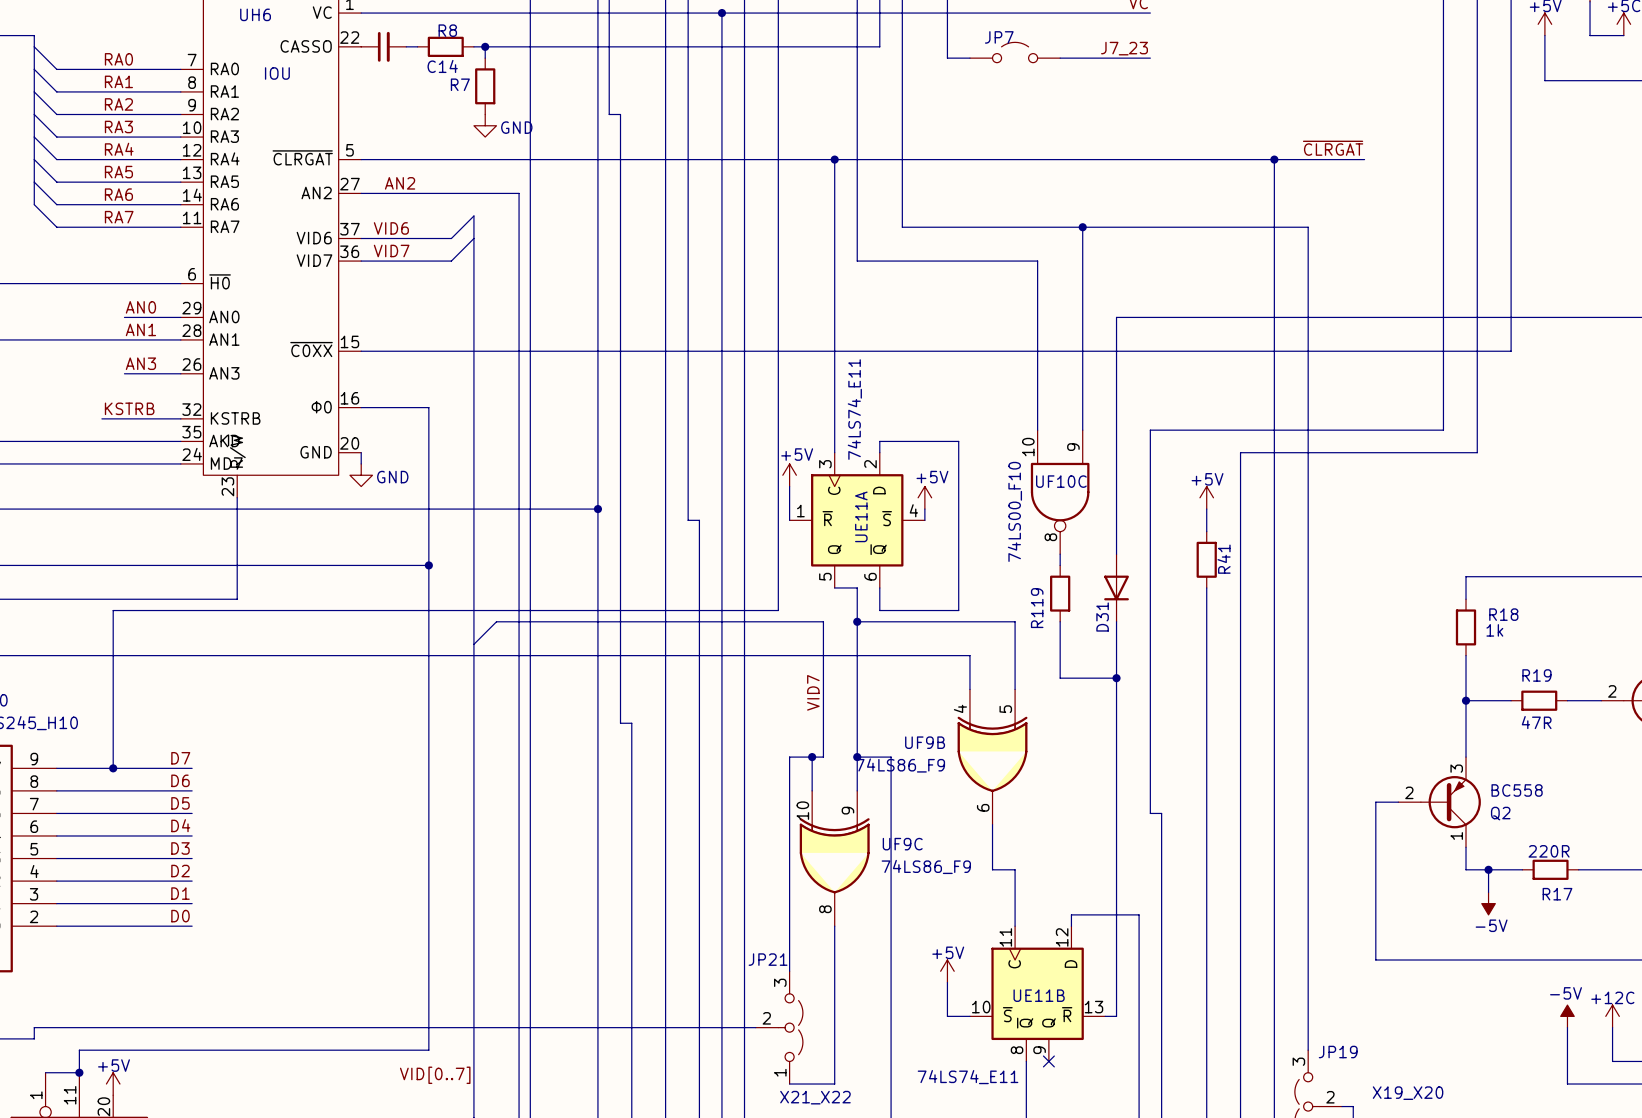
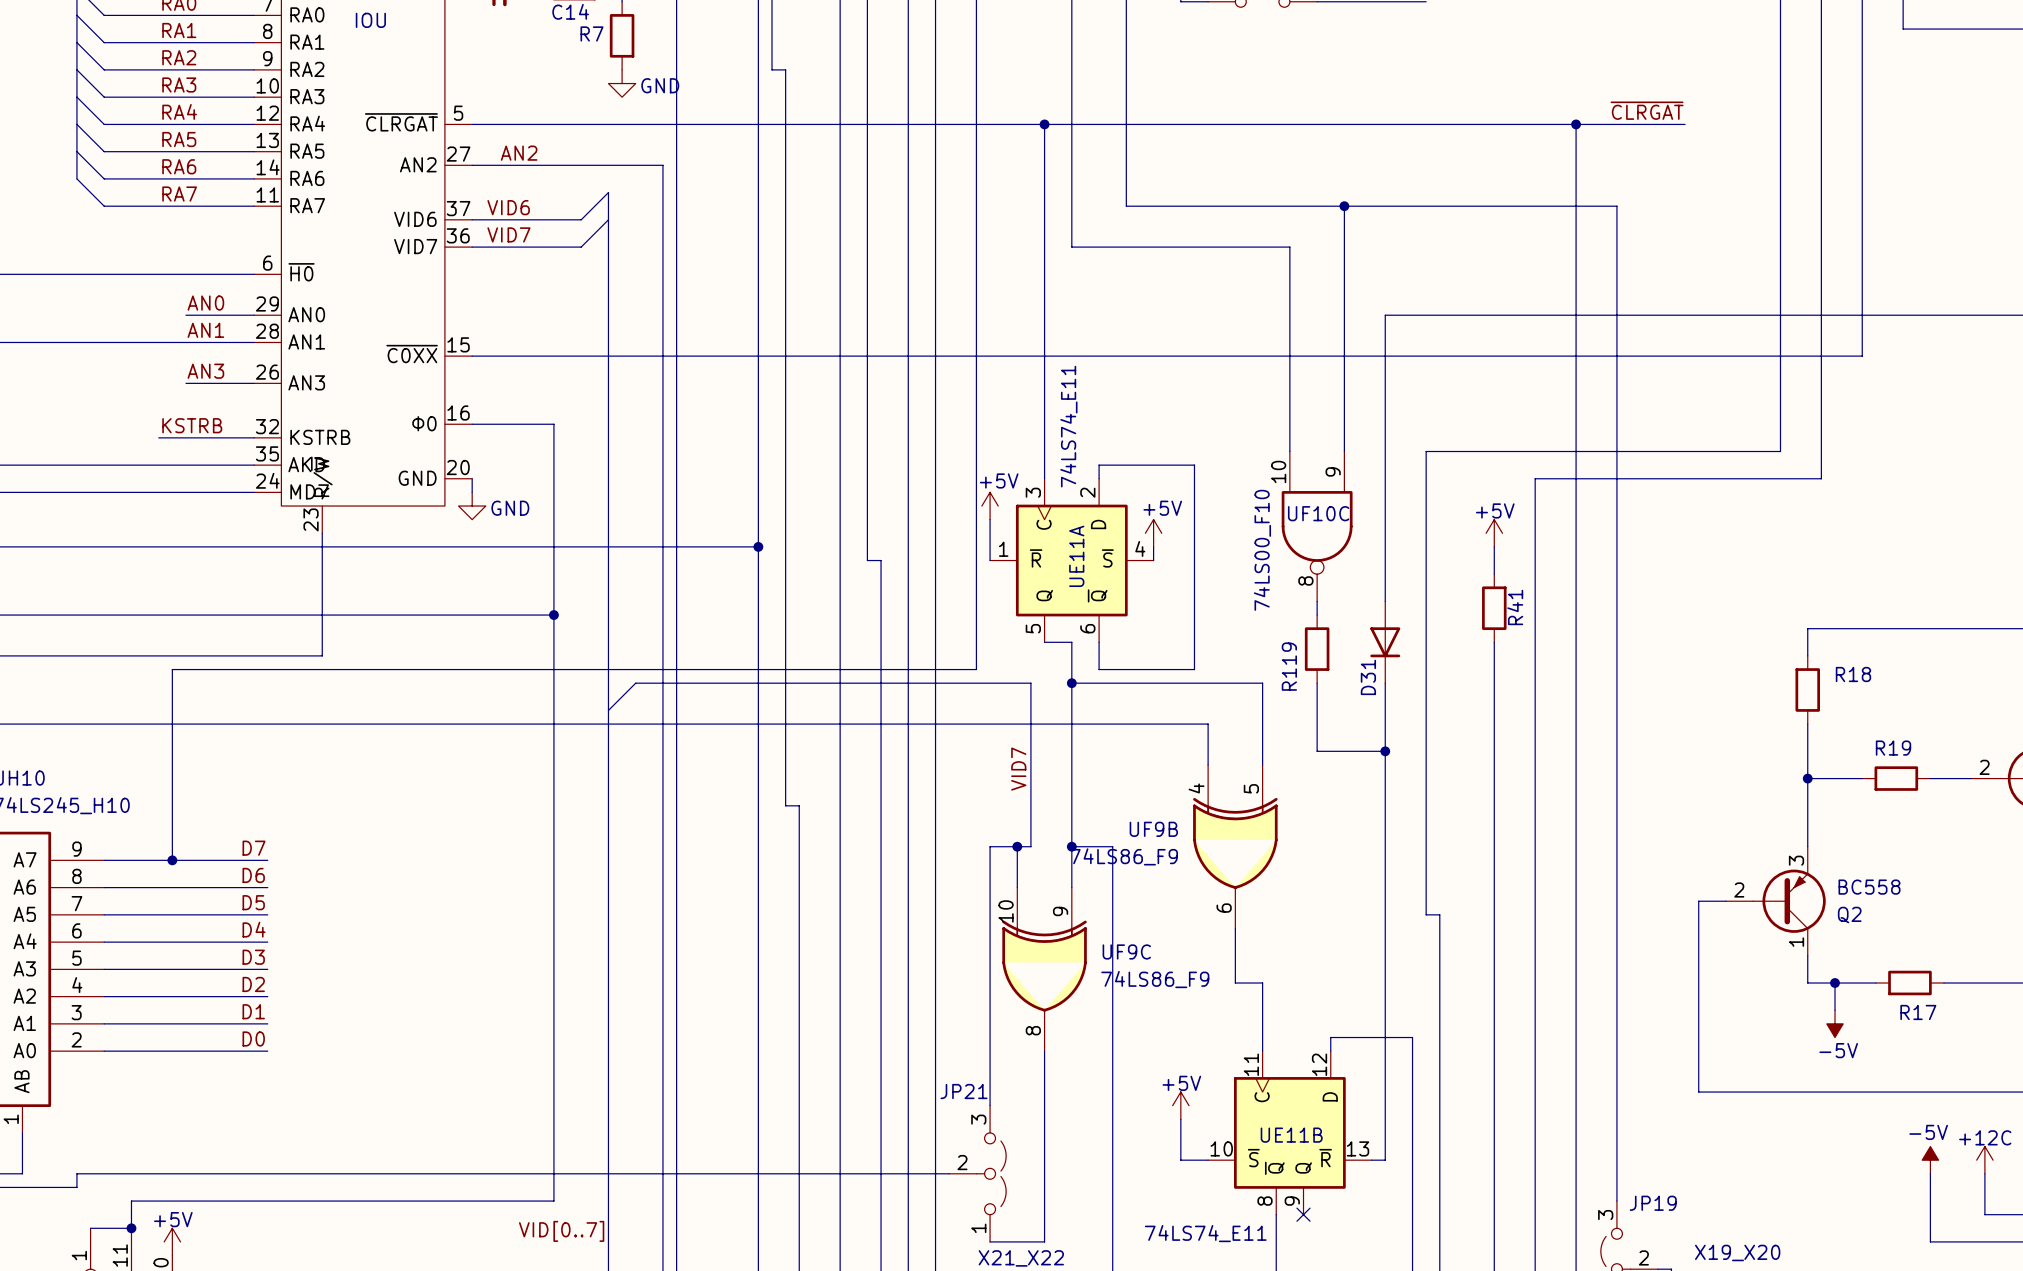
R18 value: 1k (1494, 630) -> none
R19 value: 47R (1536, 722) -> none
R17 value: 220R (1549, 851) -> none

